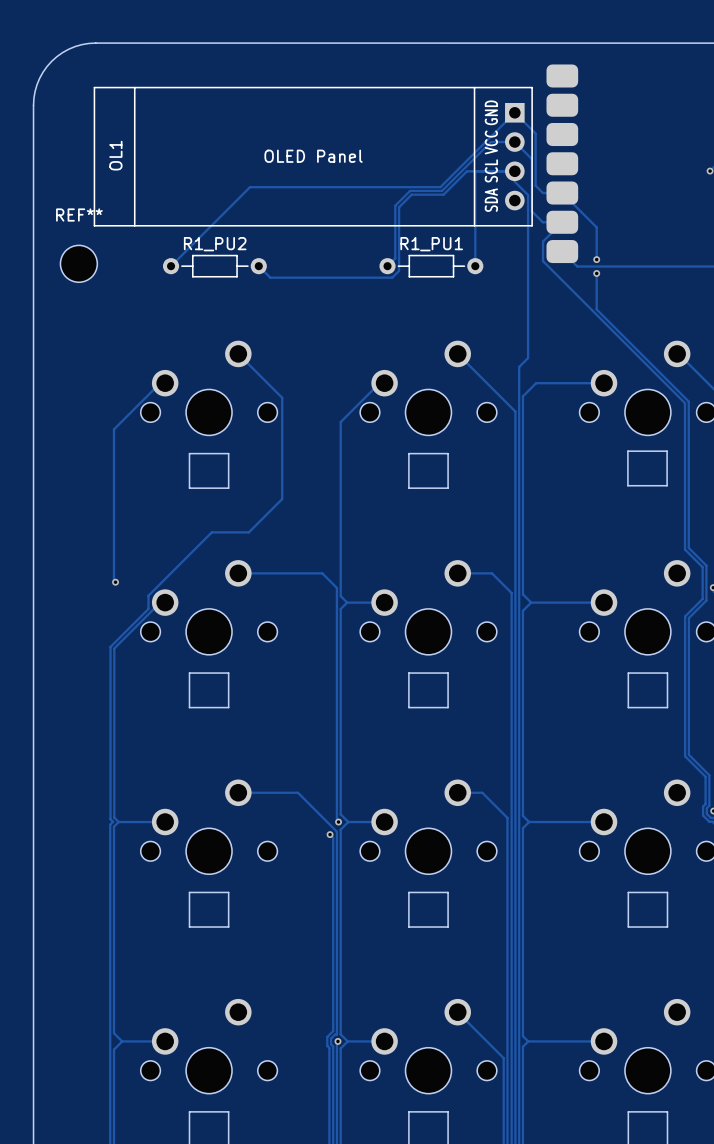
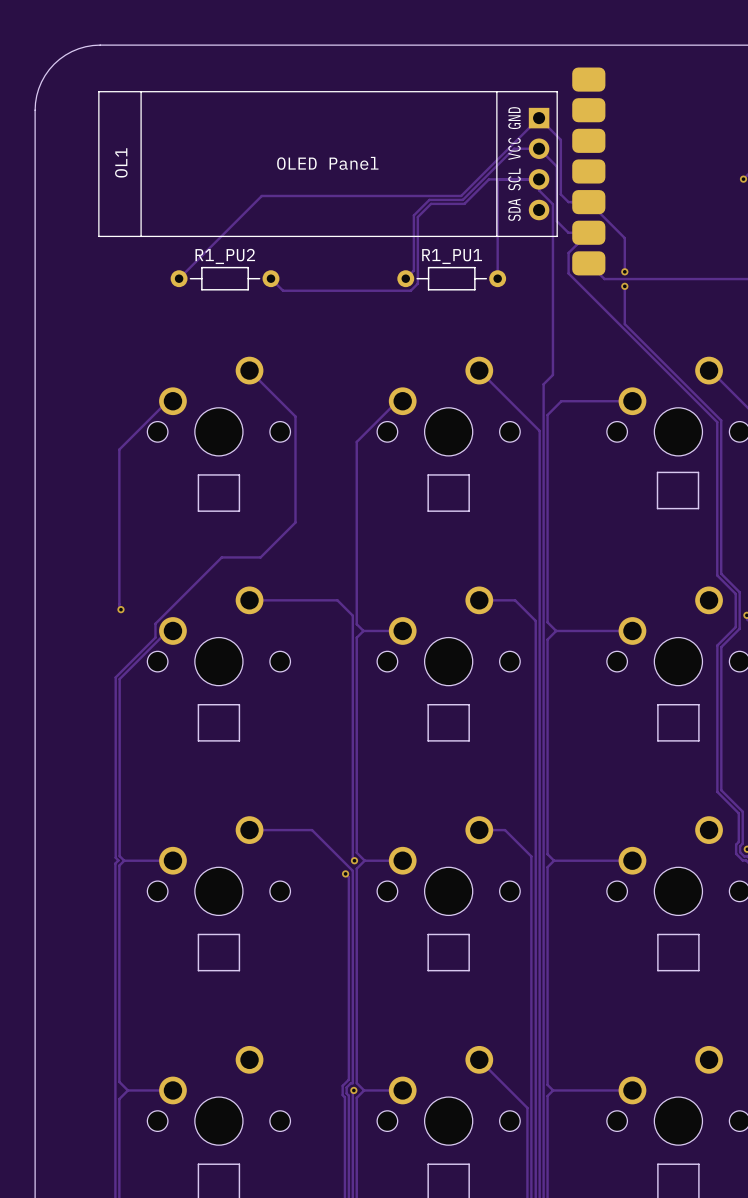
REF**: (78, 263) -> none

